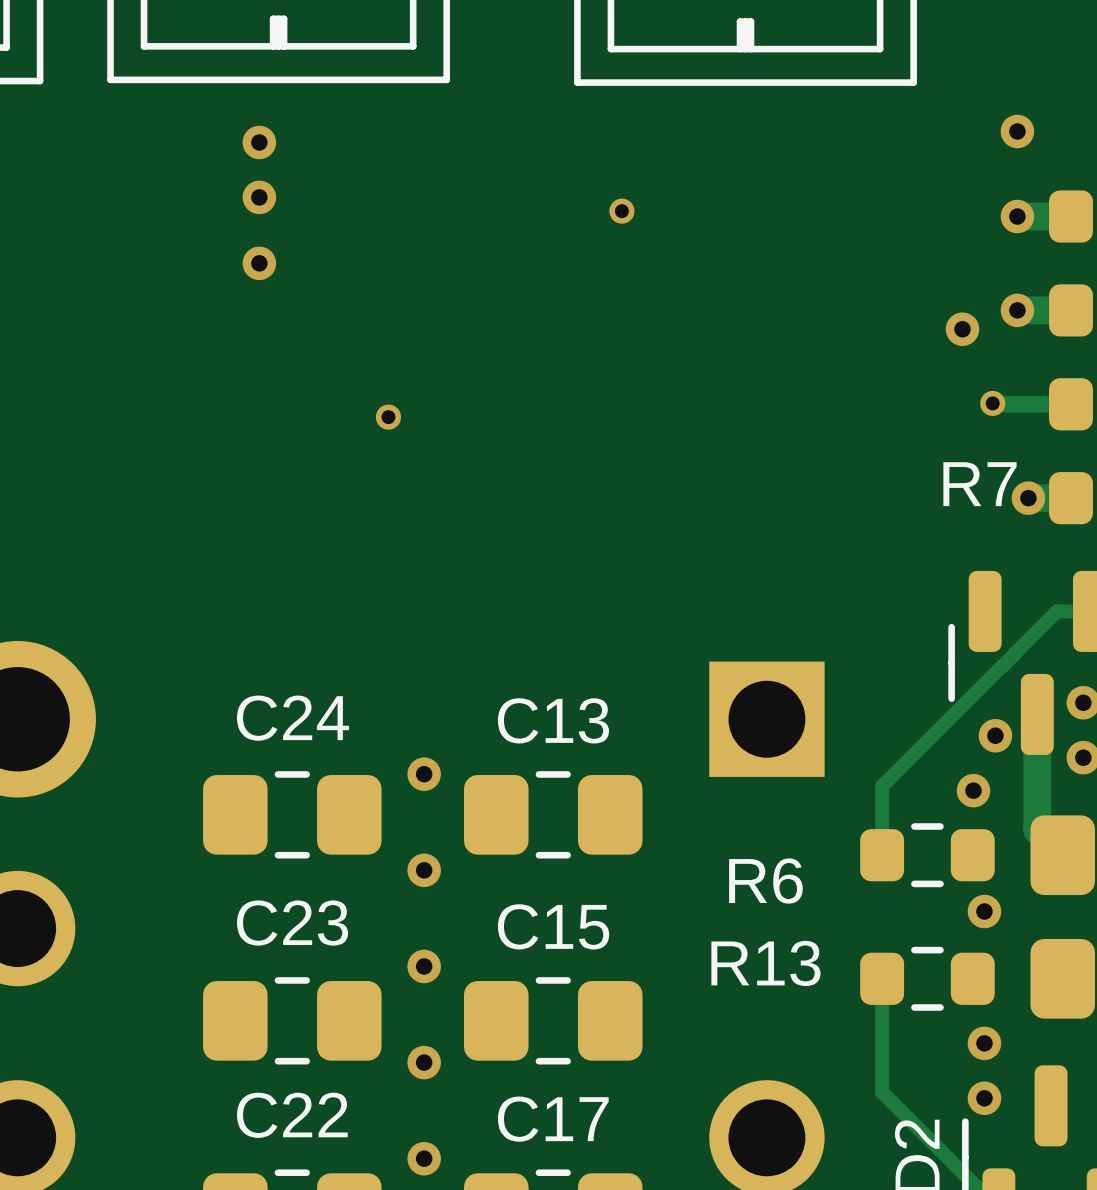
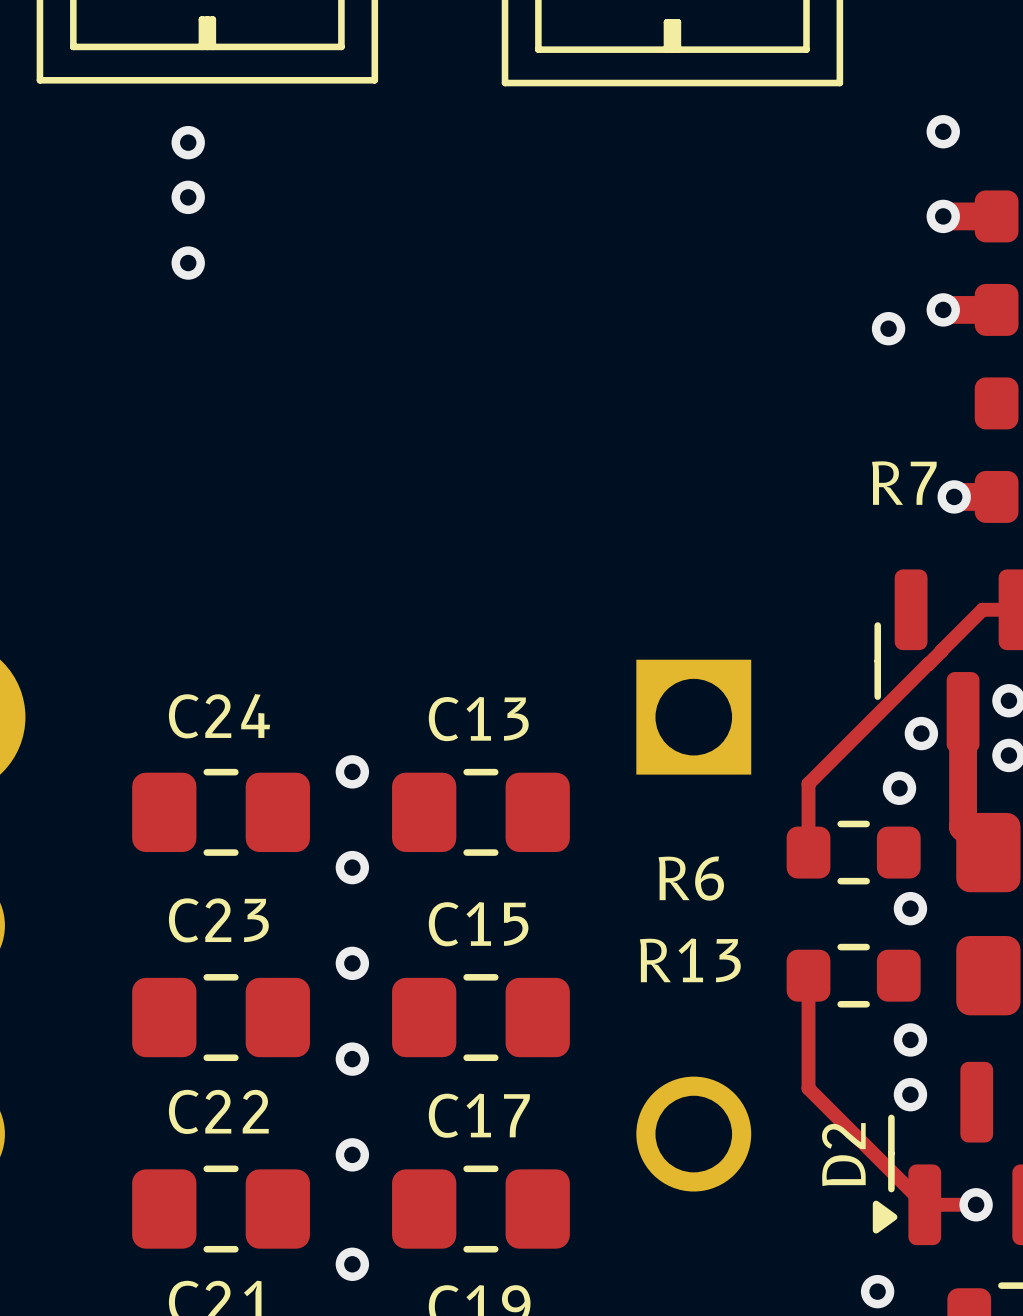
via: (621, 211) -> none
track: (992, 403) (1070, 404) -> none
via: (992, 403) -> none
via: (388, 417) -> none

